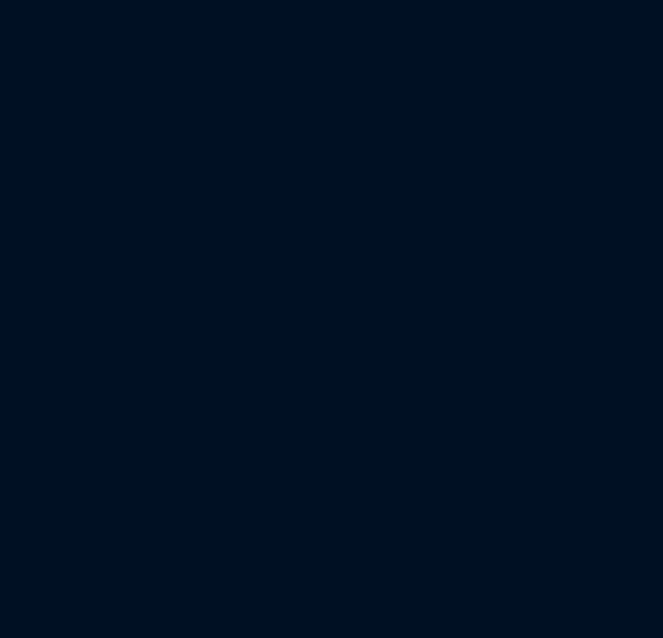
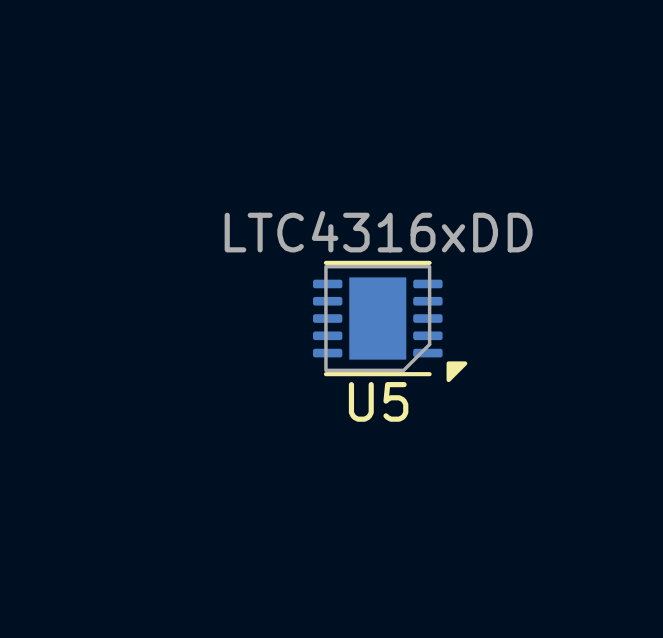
U5: none -> LTC4316xDD (390, 321)

